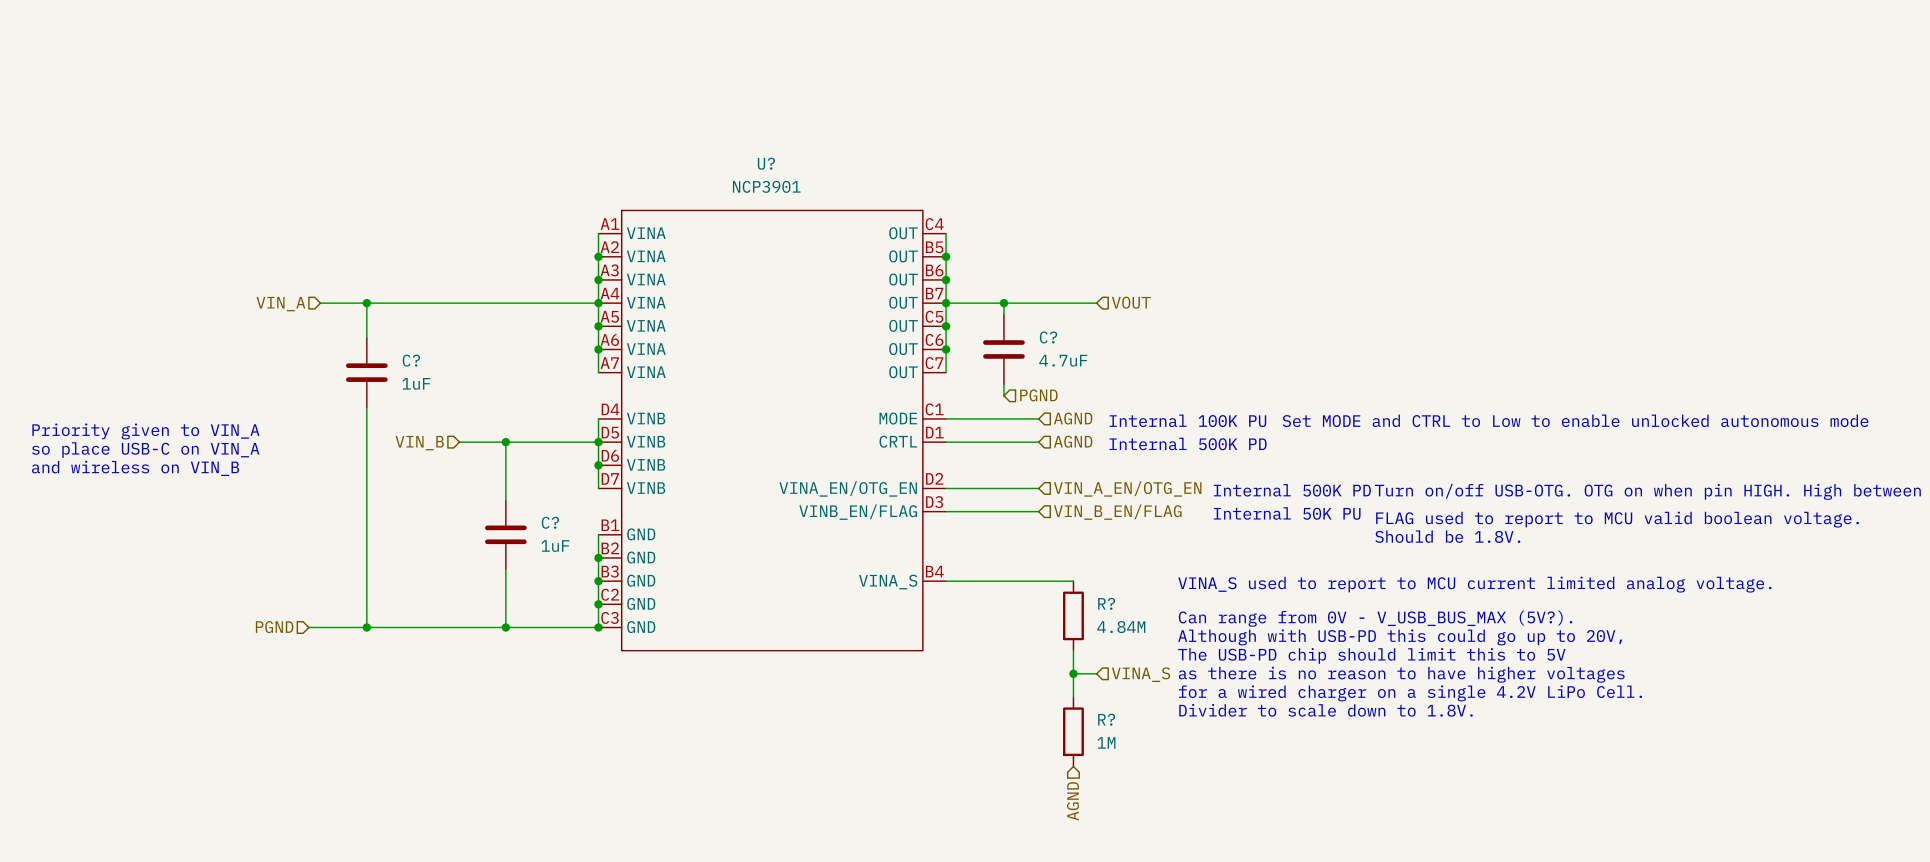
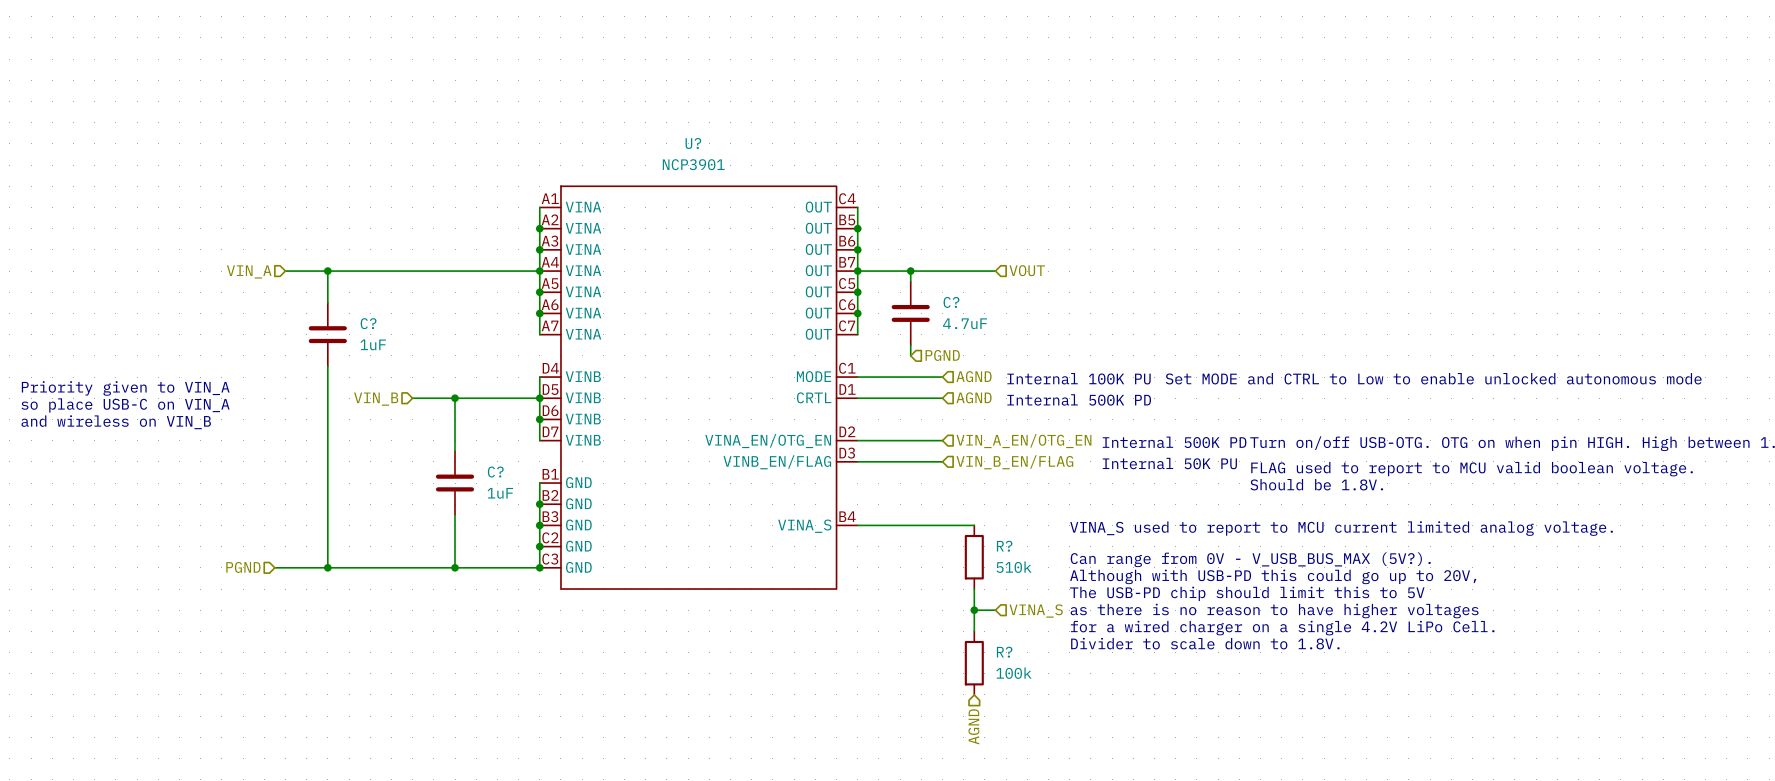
R? value: 4.84M (1121, 627) -> 510k (1014, 567)
R? value: 1M (1106, 742) -> 100k (1013, 673)

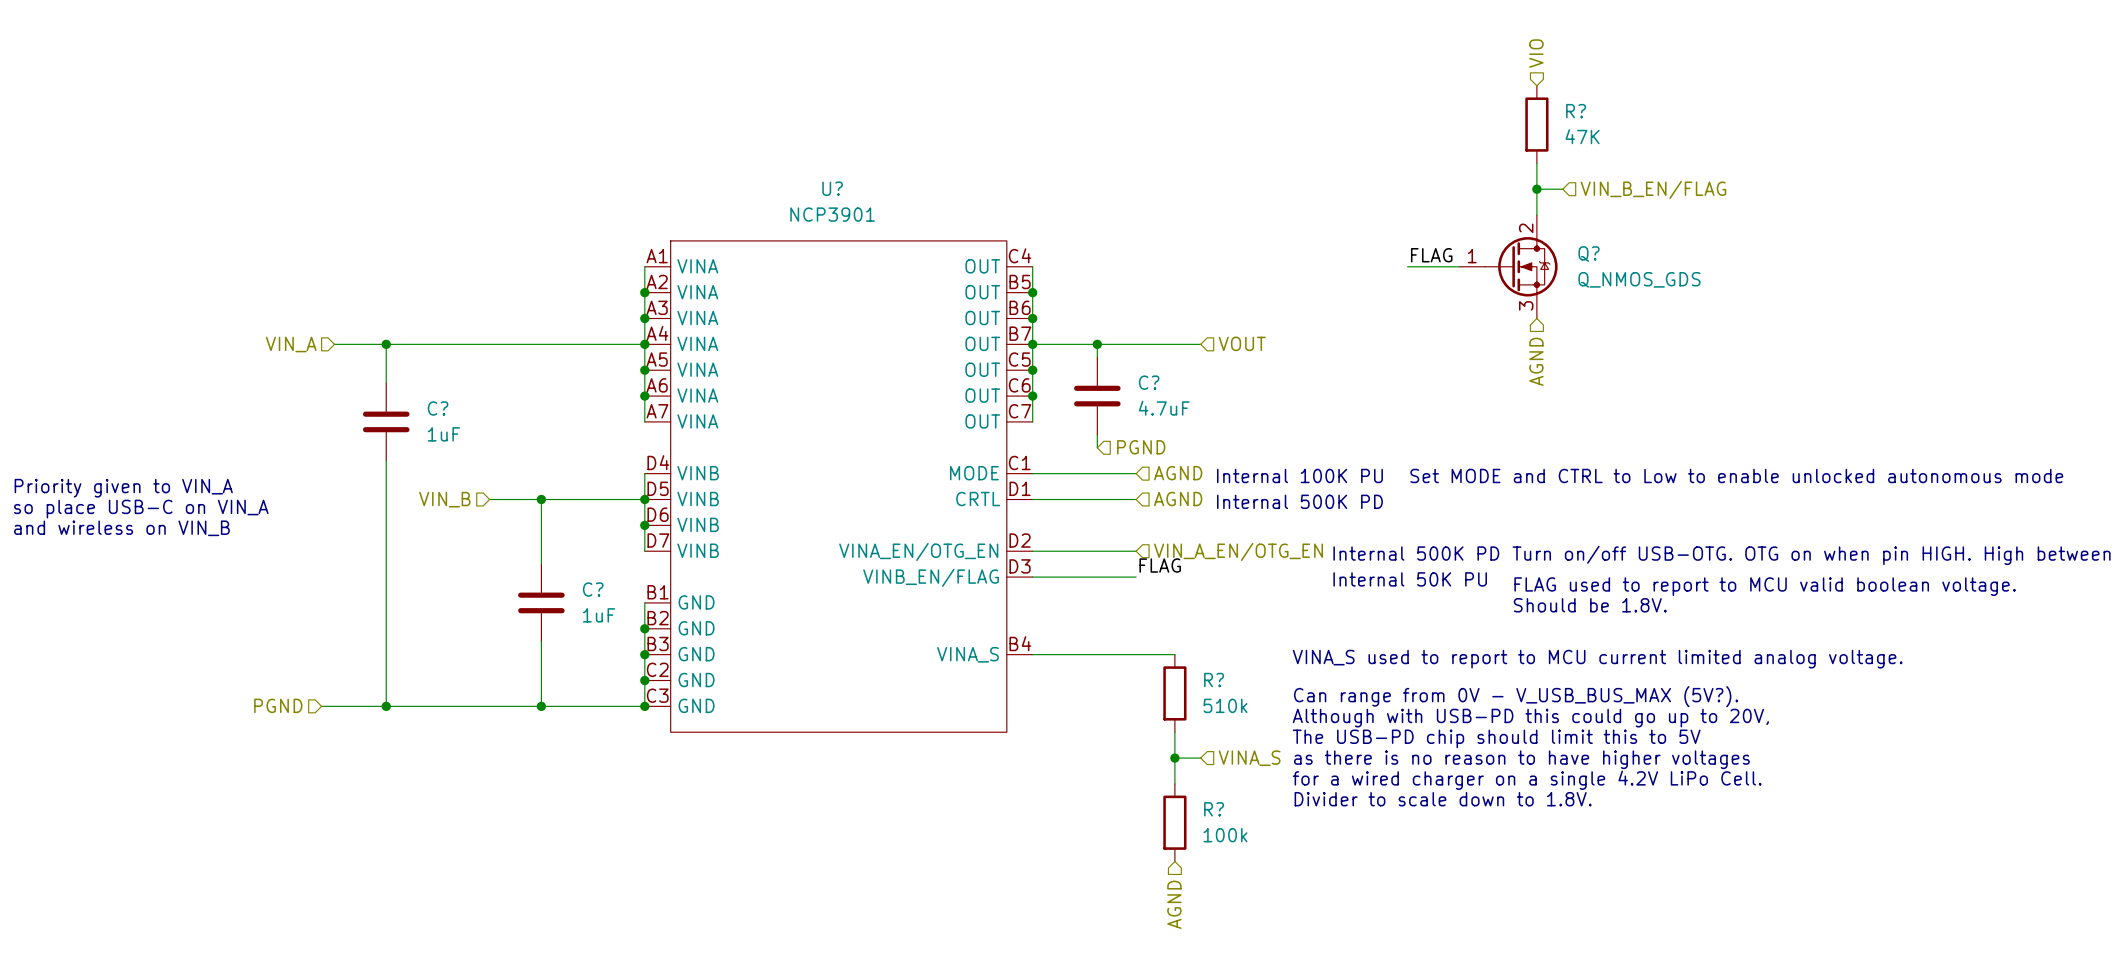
hierarchical label: none -> VIO (1536, 53)
R?: none -> 47K (1536, 124)
wire: none -> (1536, 163) (1536, 215)
wire: none -> (1536, 189) (1562, 189)
junction: none -> (1536, 189)
hierarchical label: none -> VIN_B_EN/FLAG (1653, 189)
label: none -> FLAG (1431, 255)
wire: none -> (1407, 266) (1459, 266)
Q?: none -> Q_NMOS_GDS (1508, 266)
hierarchical label: none -> AGND (1536, 361)
label: none -> FLAG (1160, 565)
hierarchical label: VIN_B_EN/FLAG (1014, 462) -> none

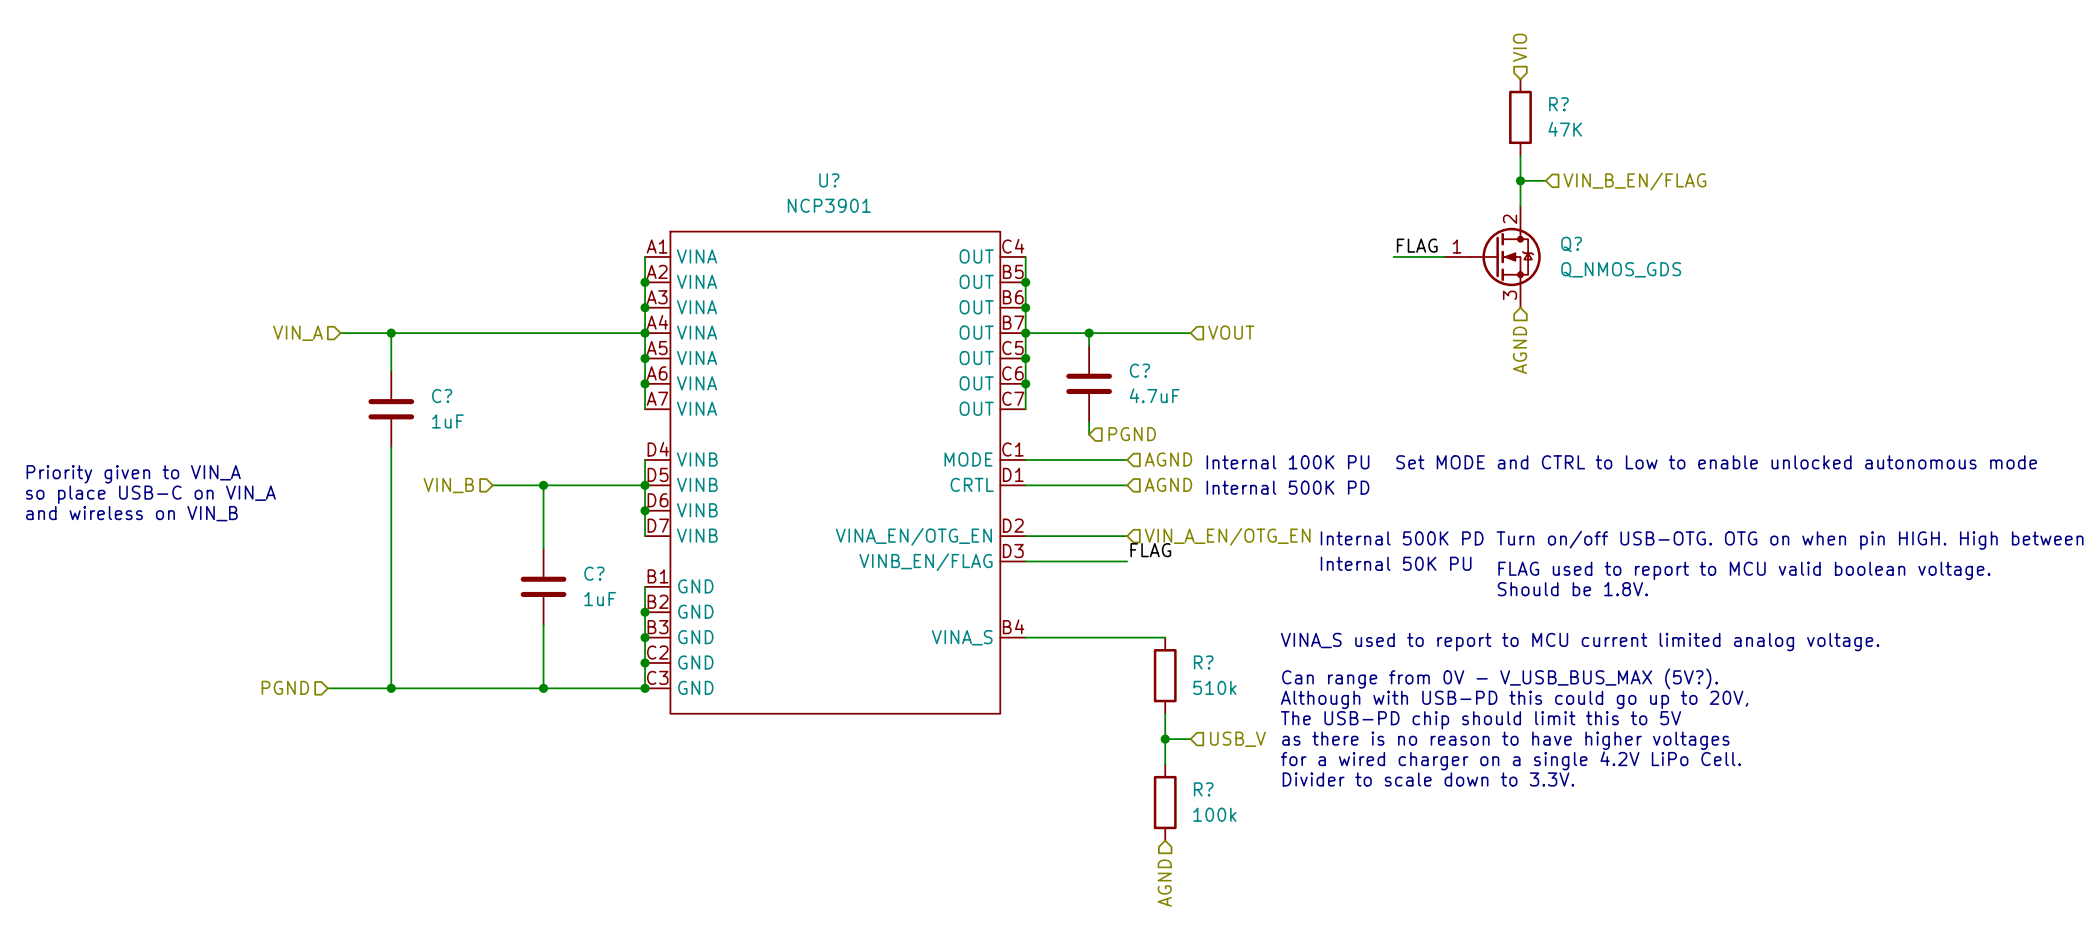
hierarchical label: VINA_S (1249, 758) -> USB_V (1237, 739)
text: Divider to scale down to 1.8V. (1443, 799) -> Divider to scale down to 3.3V. (1428, 779)

